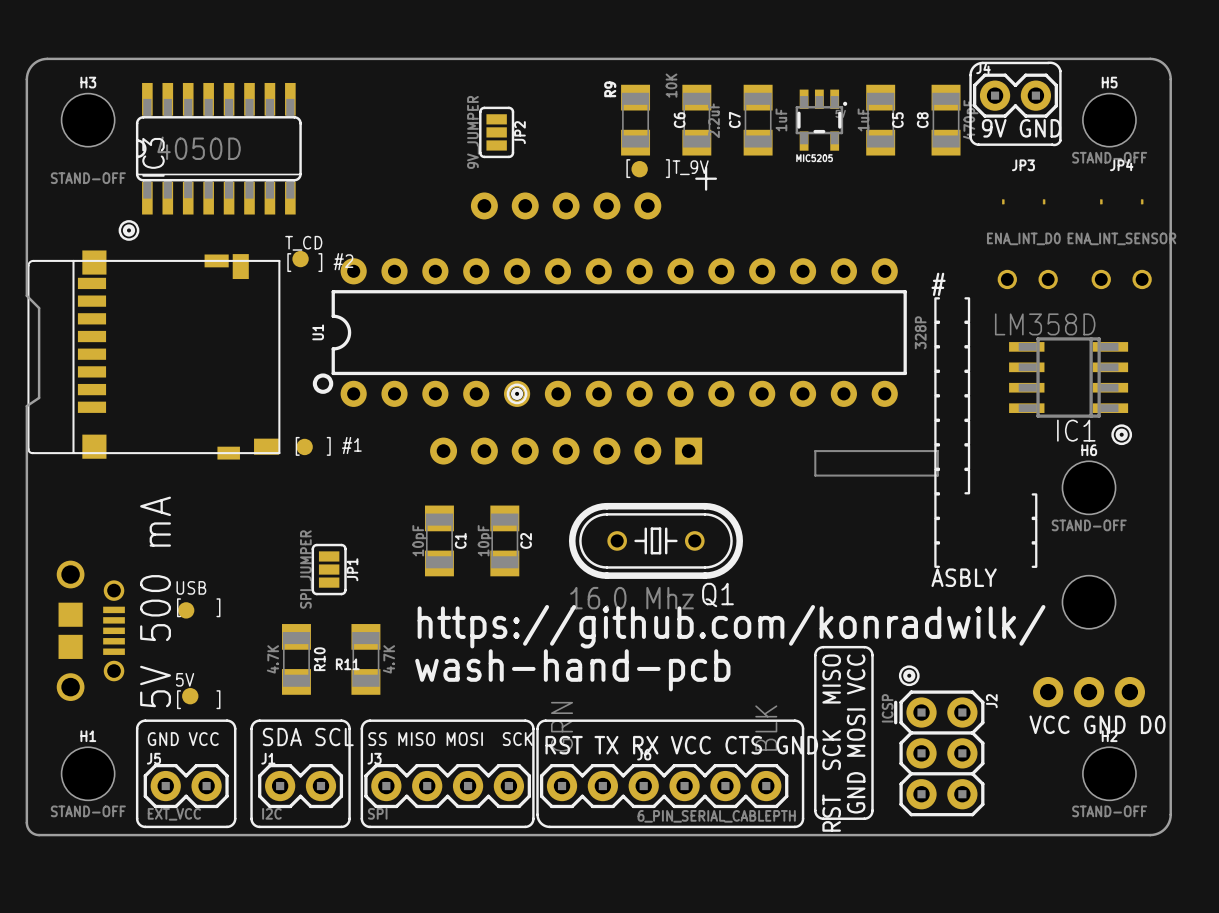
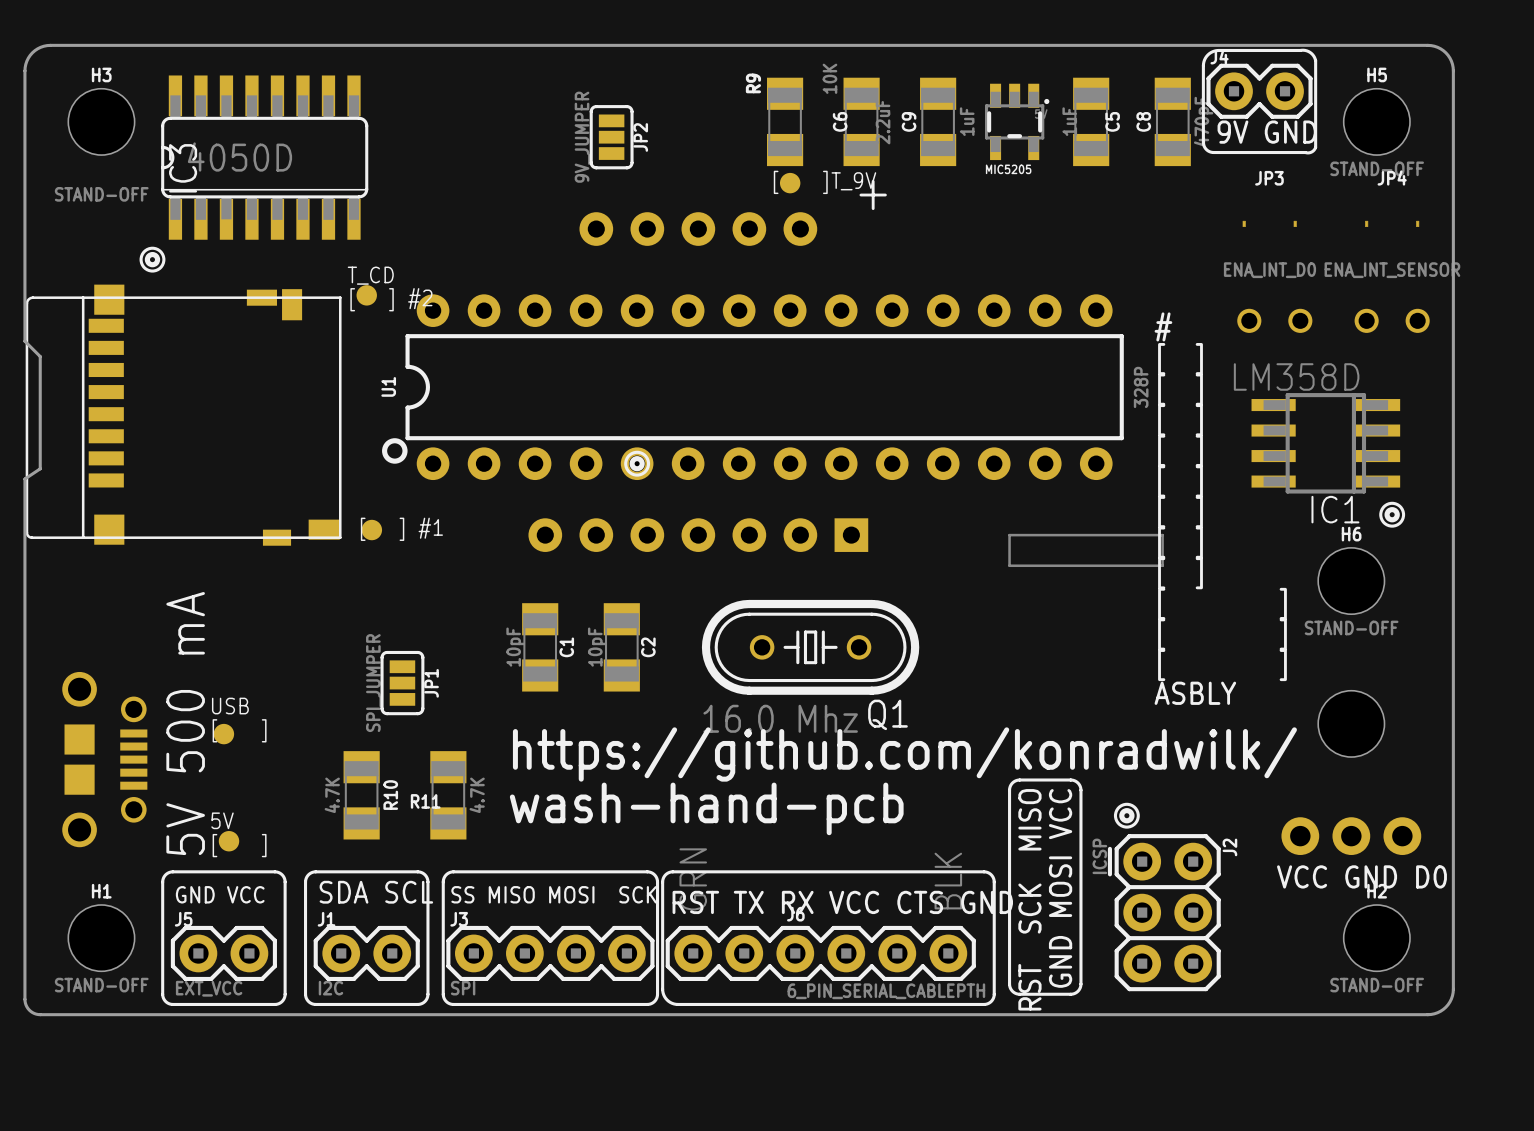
C7 name: C7 (734, 119) -> C9 (909, 121)

